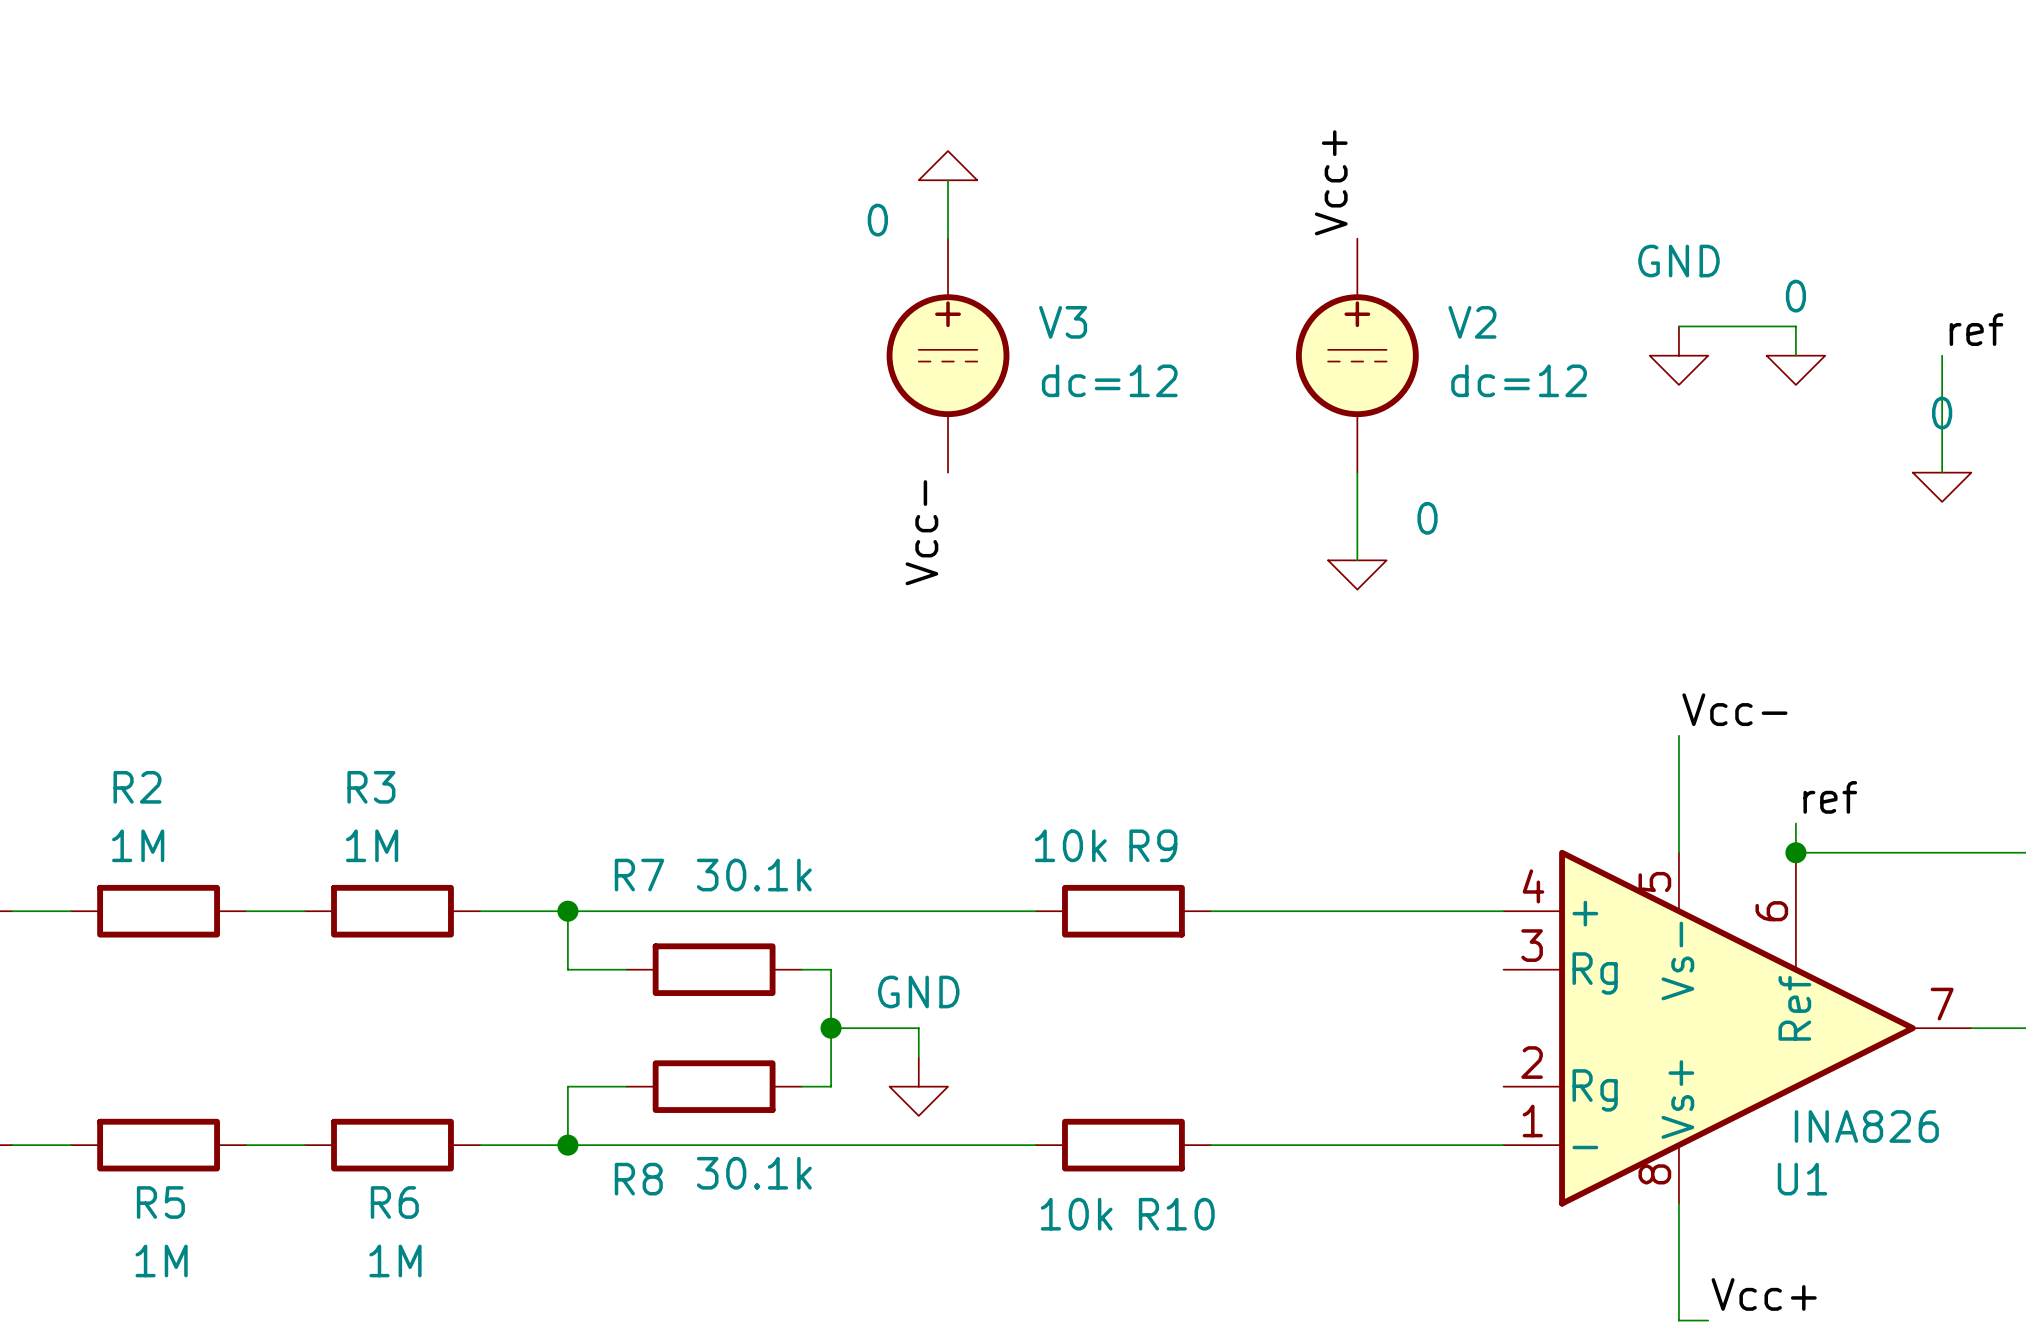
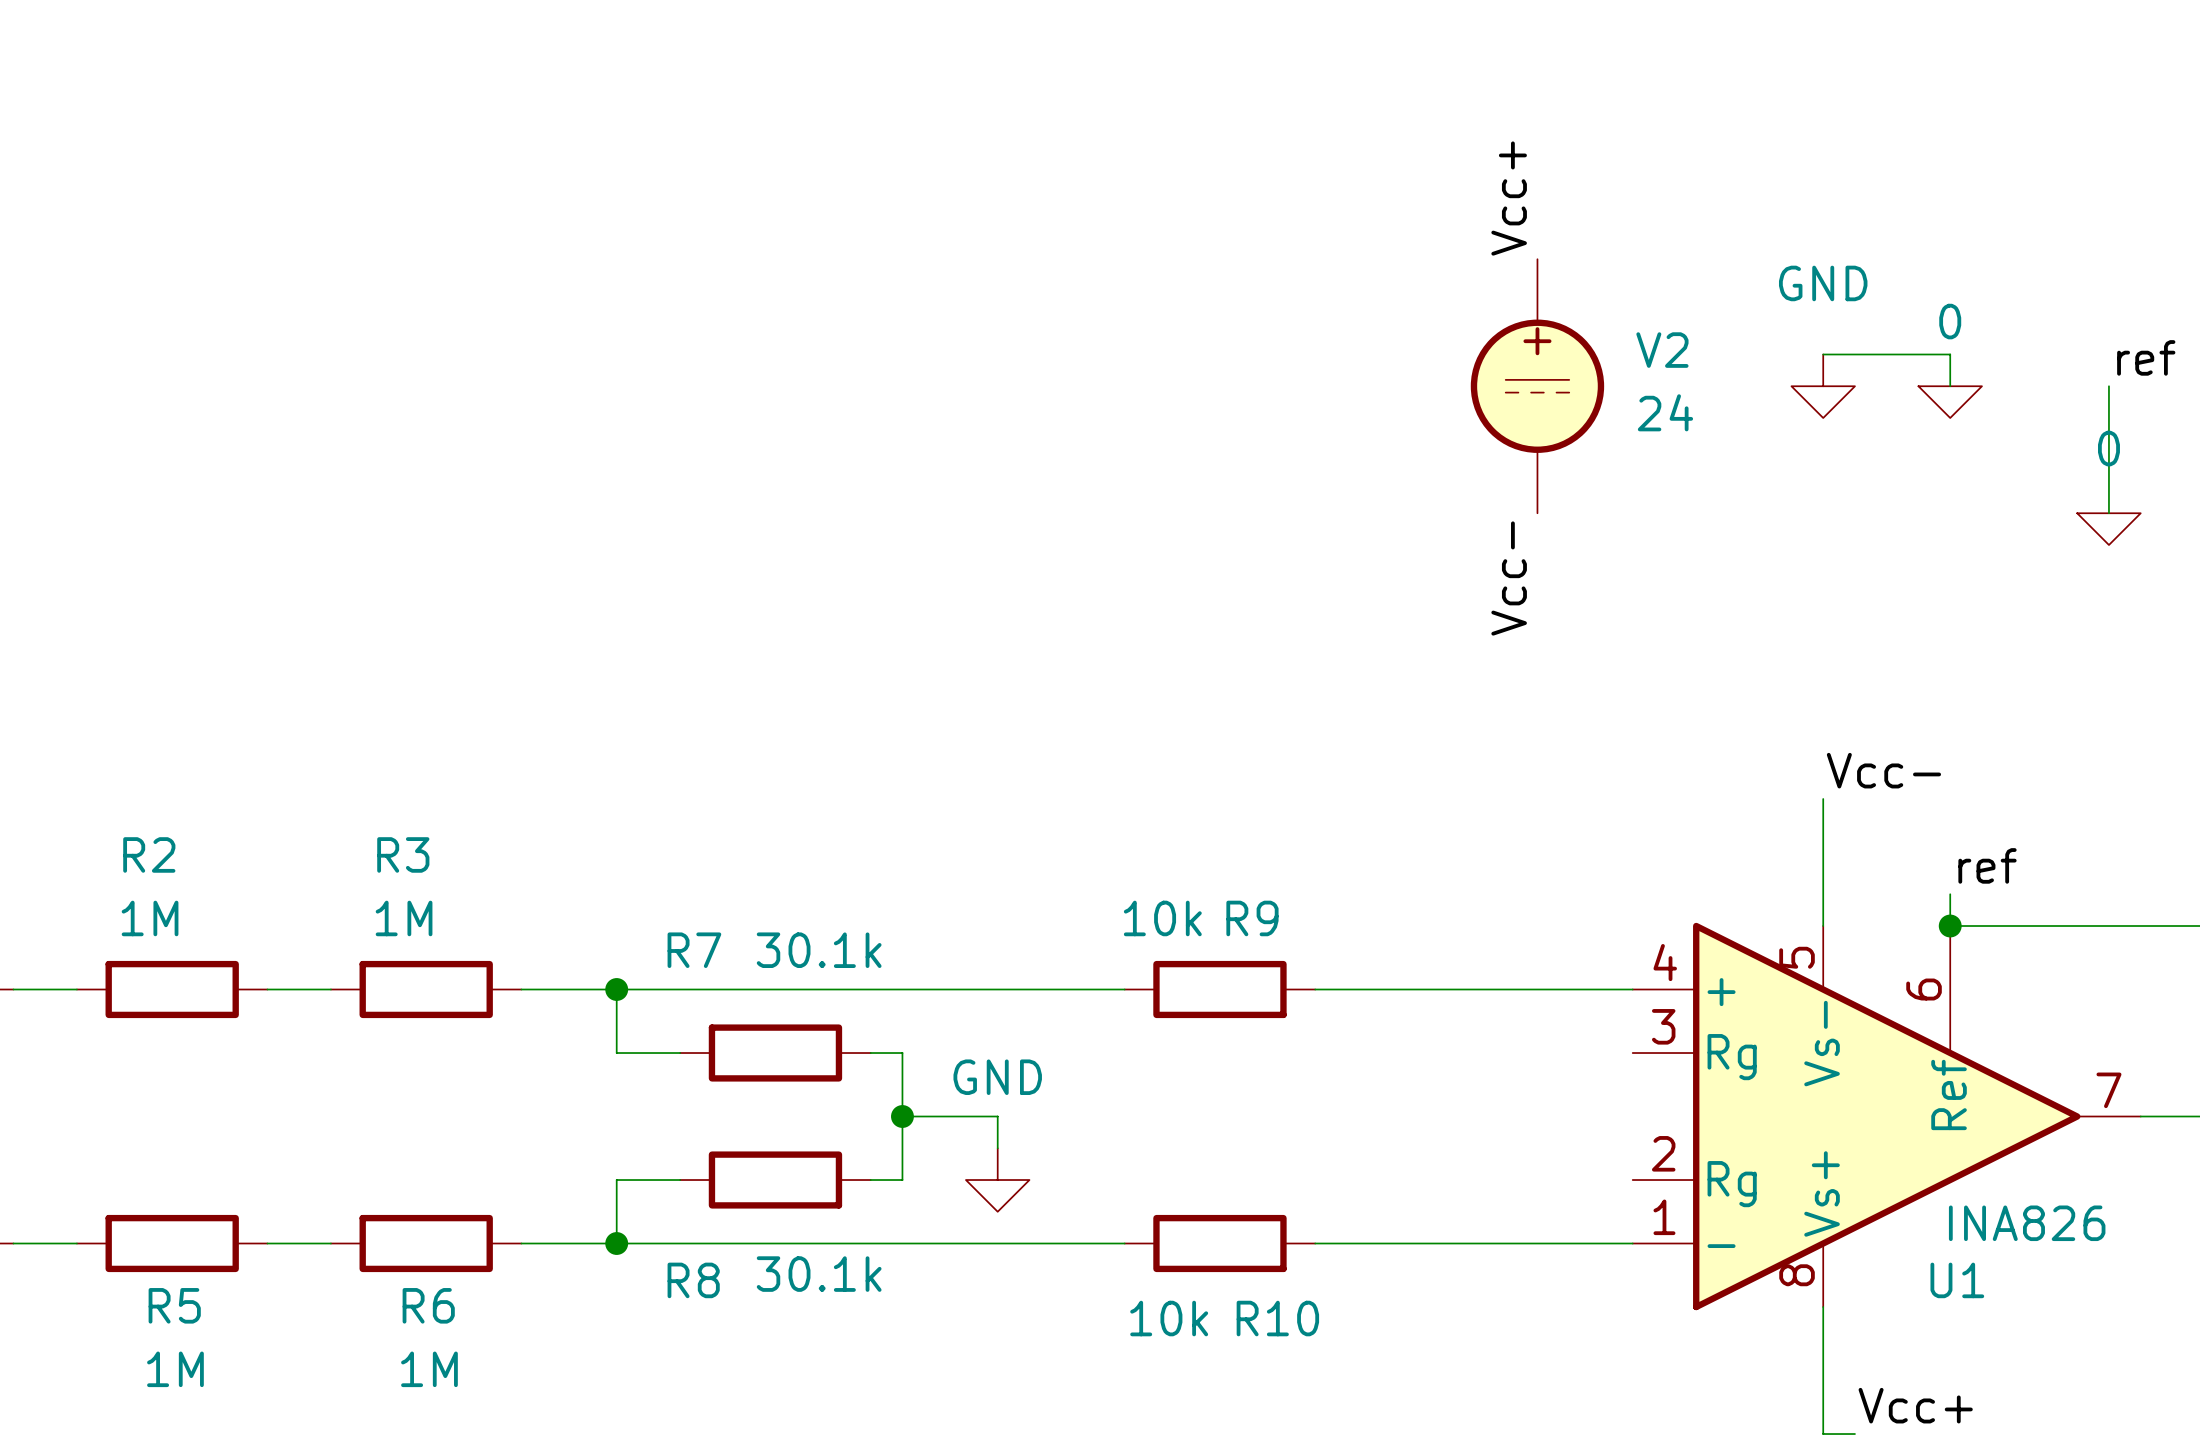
power symbol: 0 (948, 165) -> none
wire: (948, 180) (948, 238) -> none
label position: Vcc+ (1331, 182) -> Vcc+ (1509, 198)
V3: dc=12 (948, 355) -> none
V2 position: (1357, 355) -> (1537, 386)
V2 value: dc=12 (1519, 380) -> 24 (1665, 412)
wire: (1357, 472) (1357, 560) -> none
label position: Vcc- (921, 532) -> Vcc- (1509, 578)
power symbol: 0 (1357, 574) -> none

